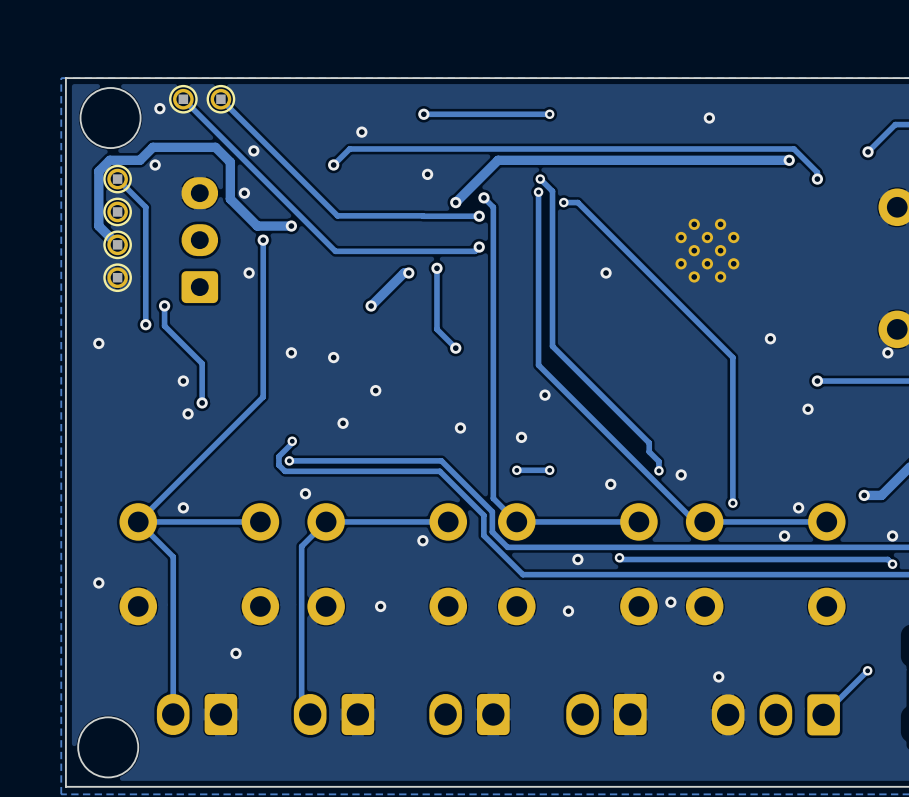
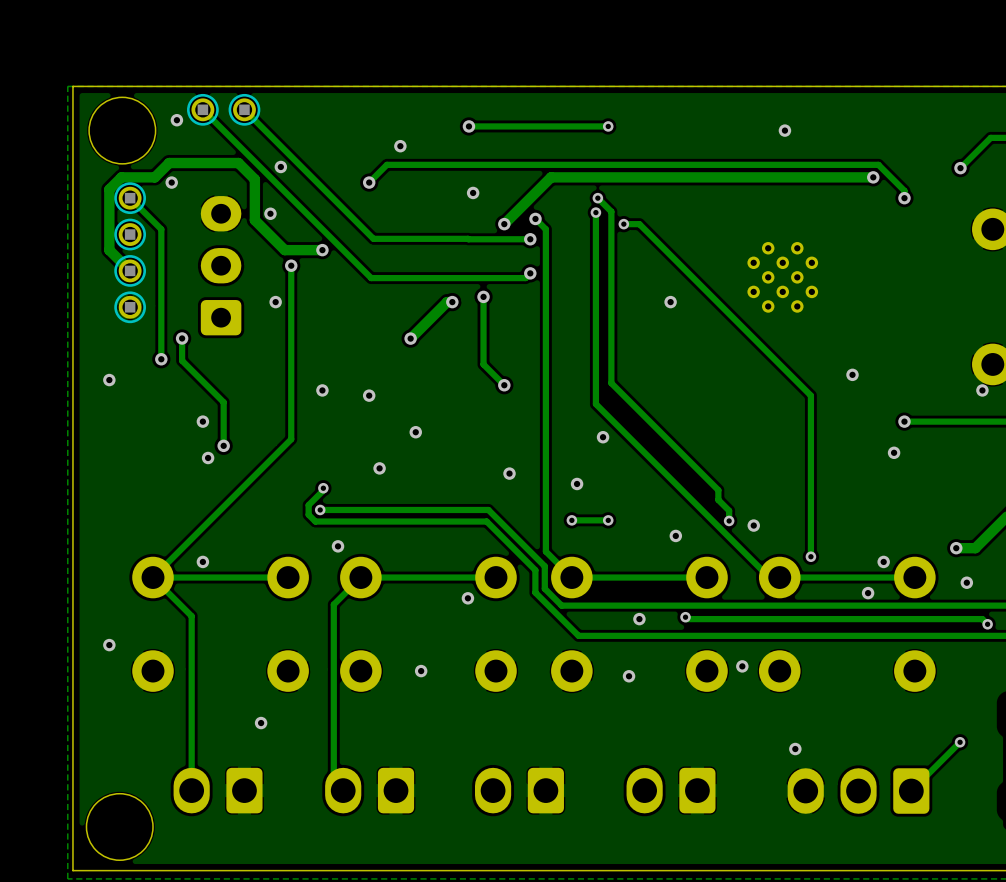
via: none -> (966, 582)
via: (892, 536) -> none

